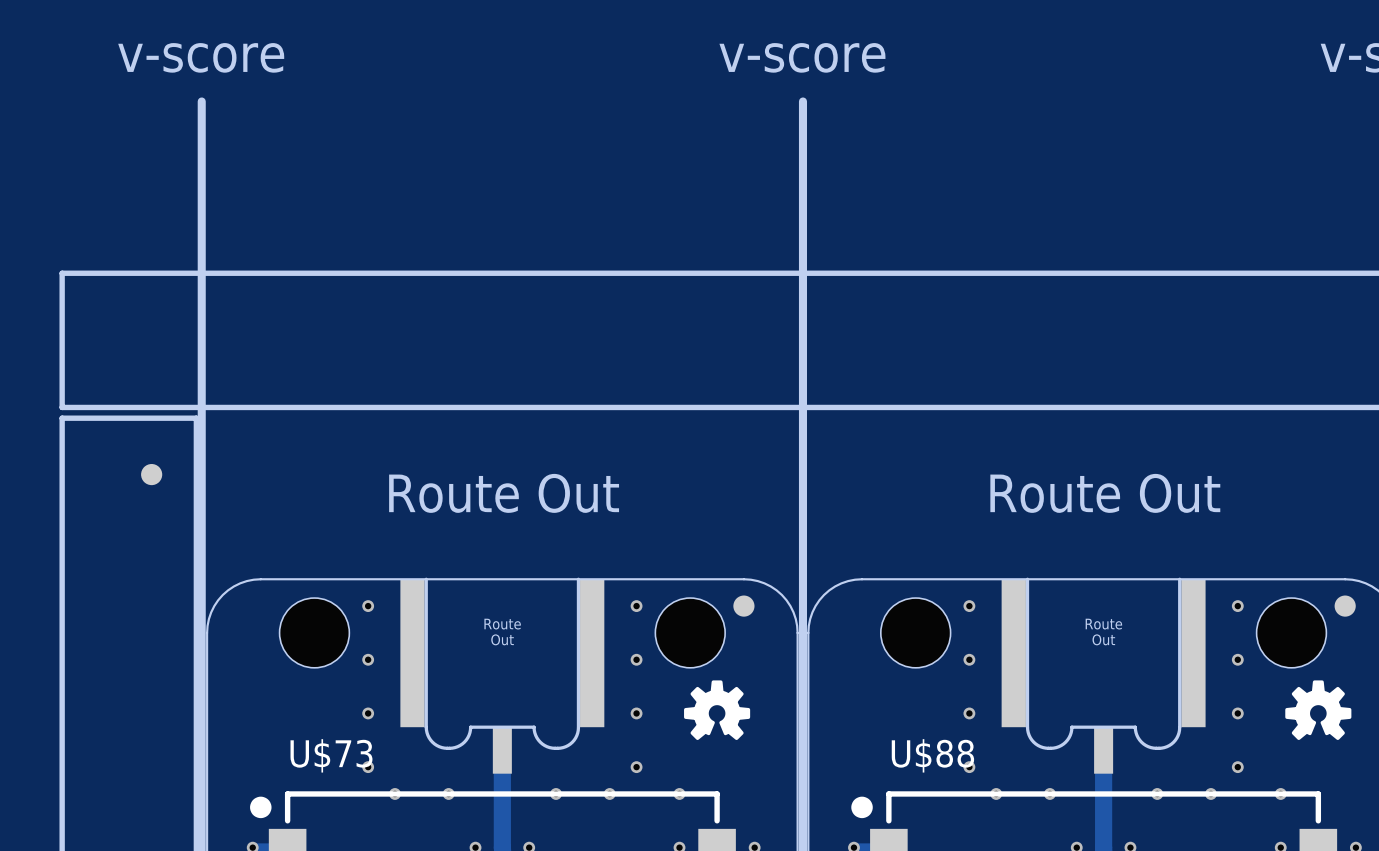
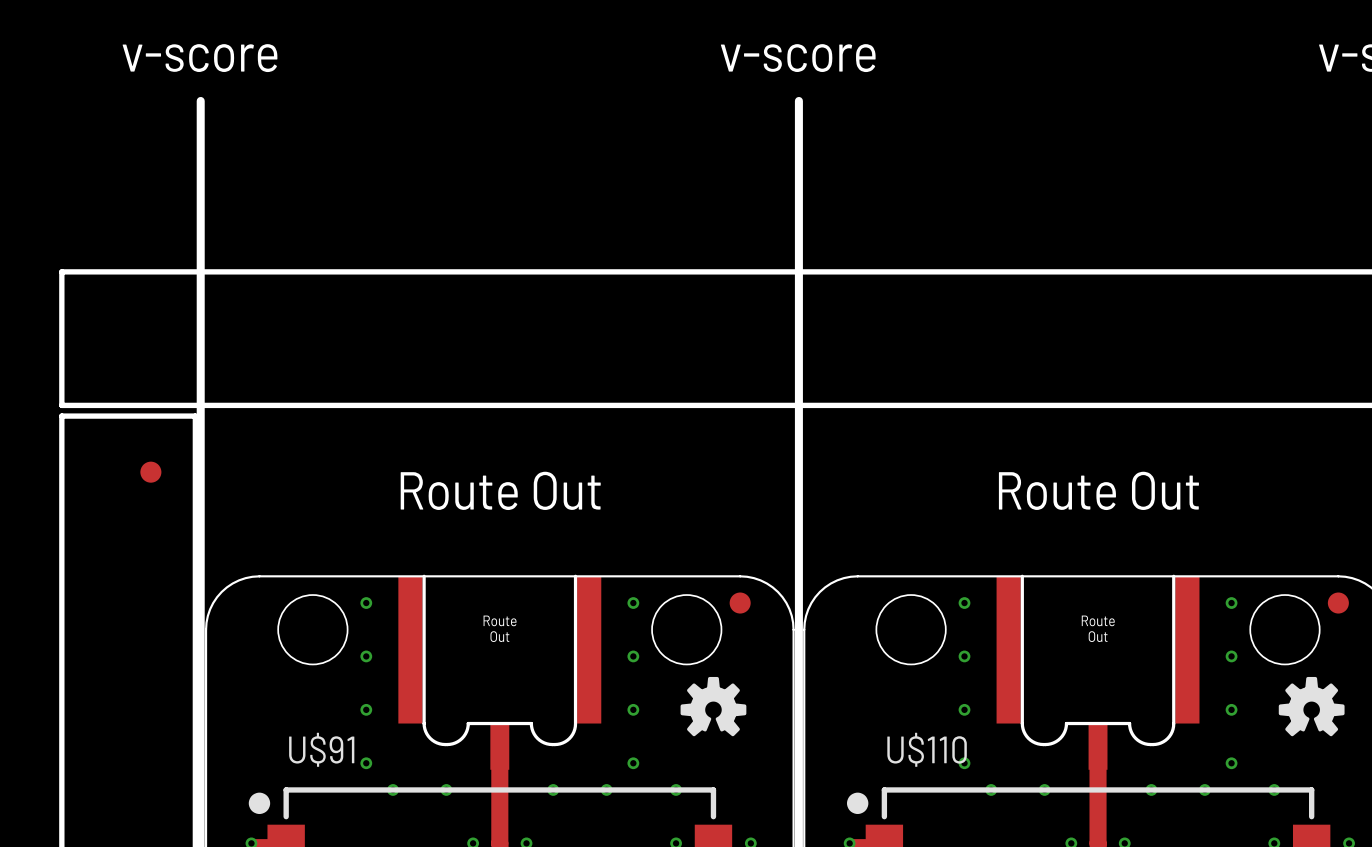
U$73 name: U$73 (331, 755) -> U$91 (321, 749)
U$88 name: U$88 (932, 755) -> U$110 (927, 749)

